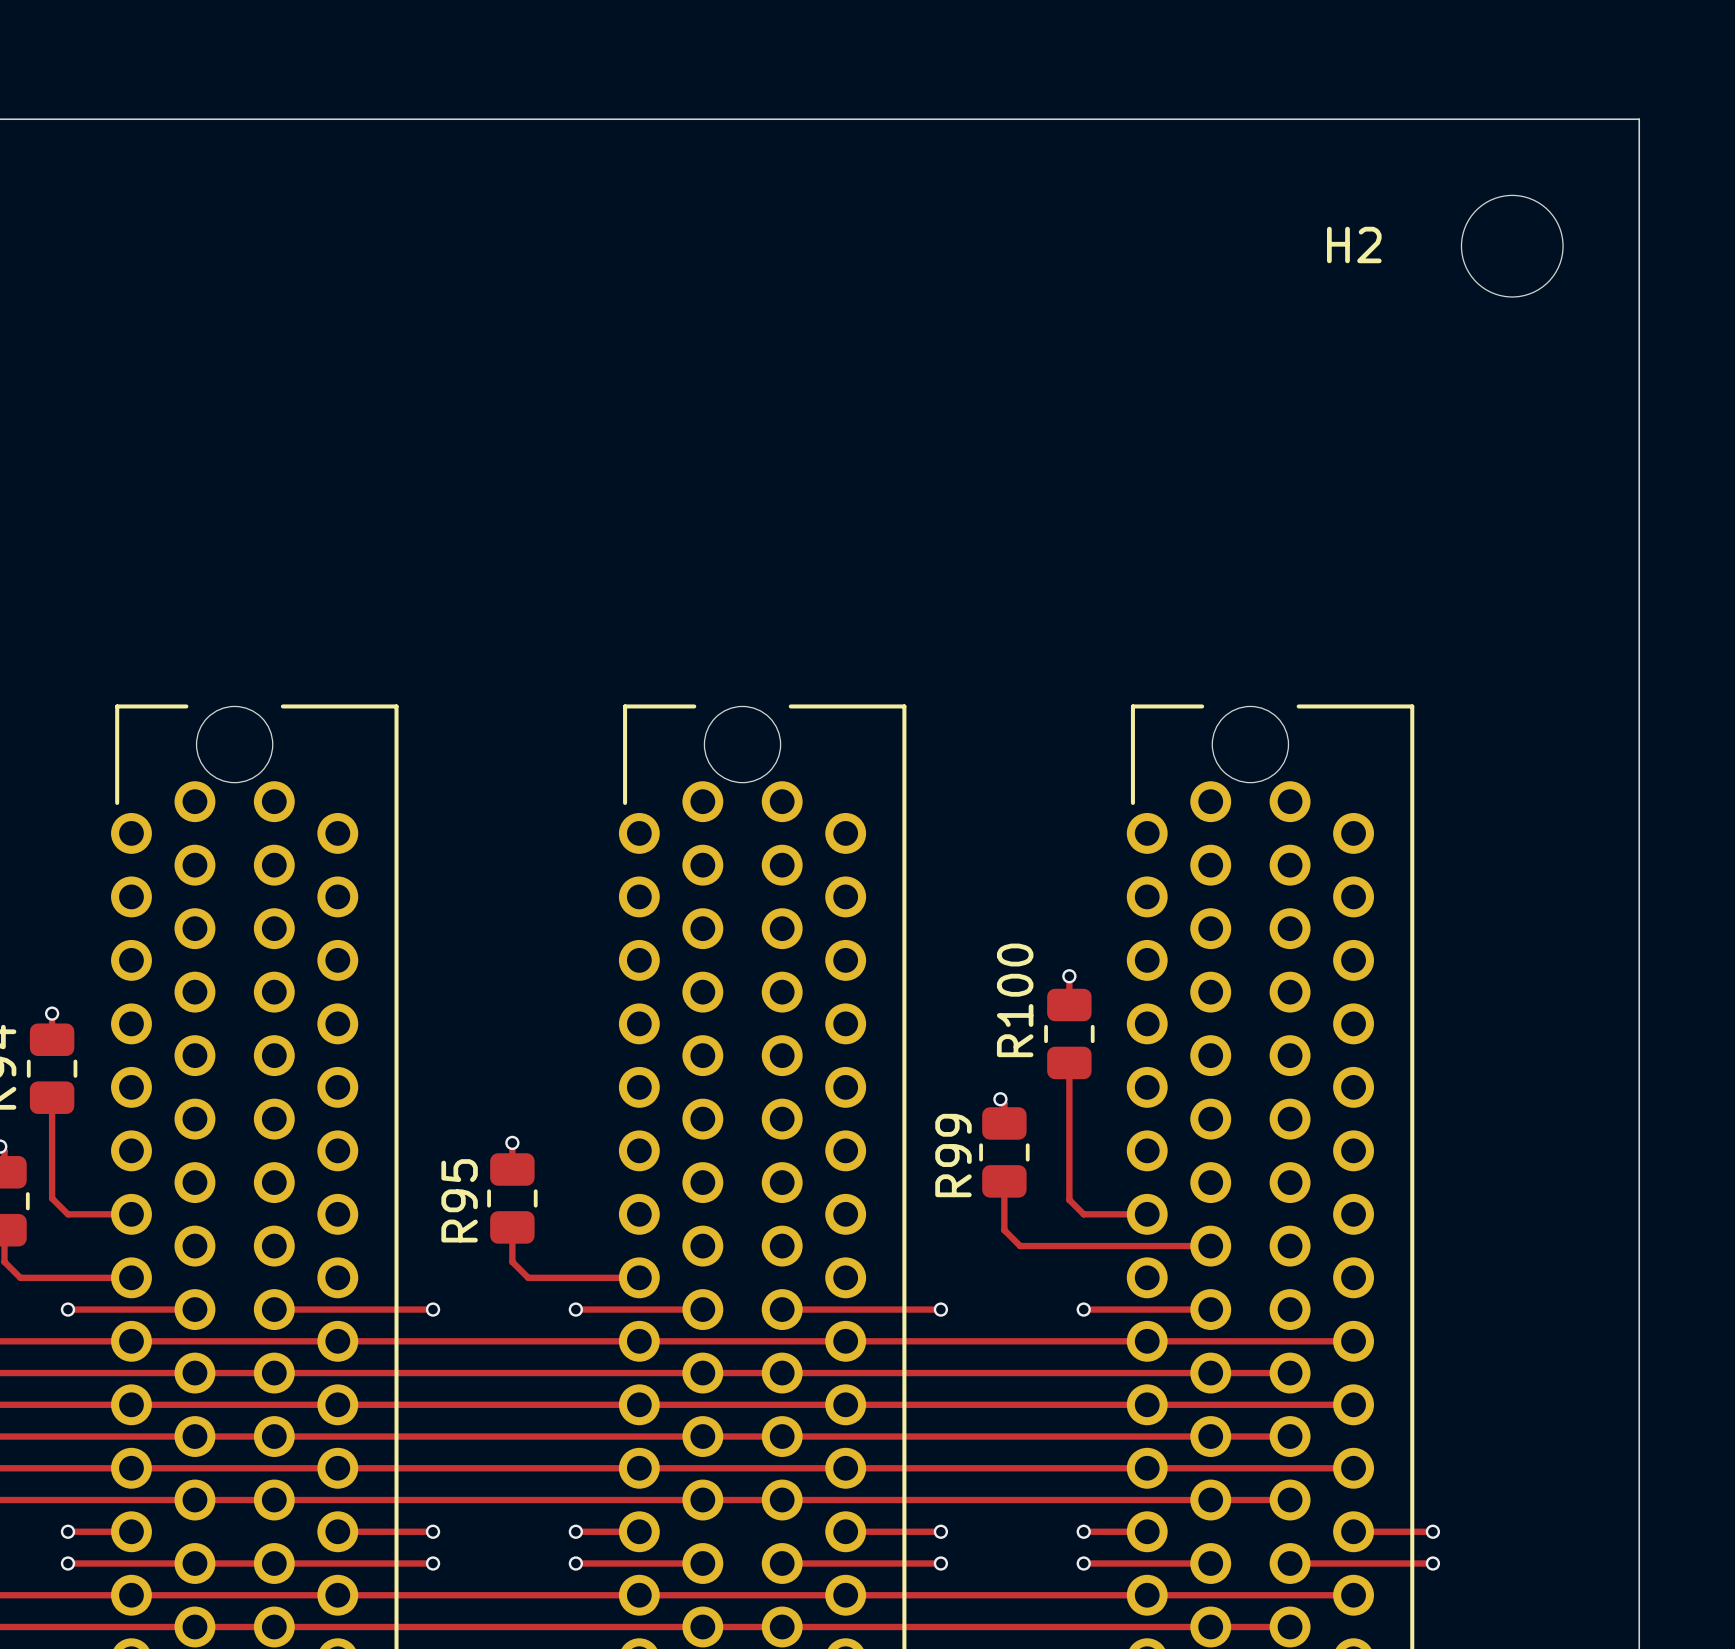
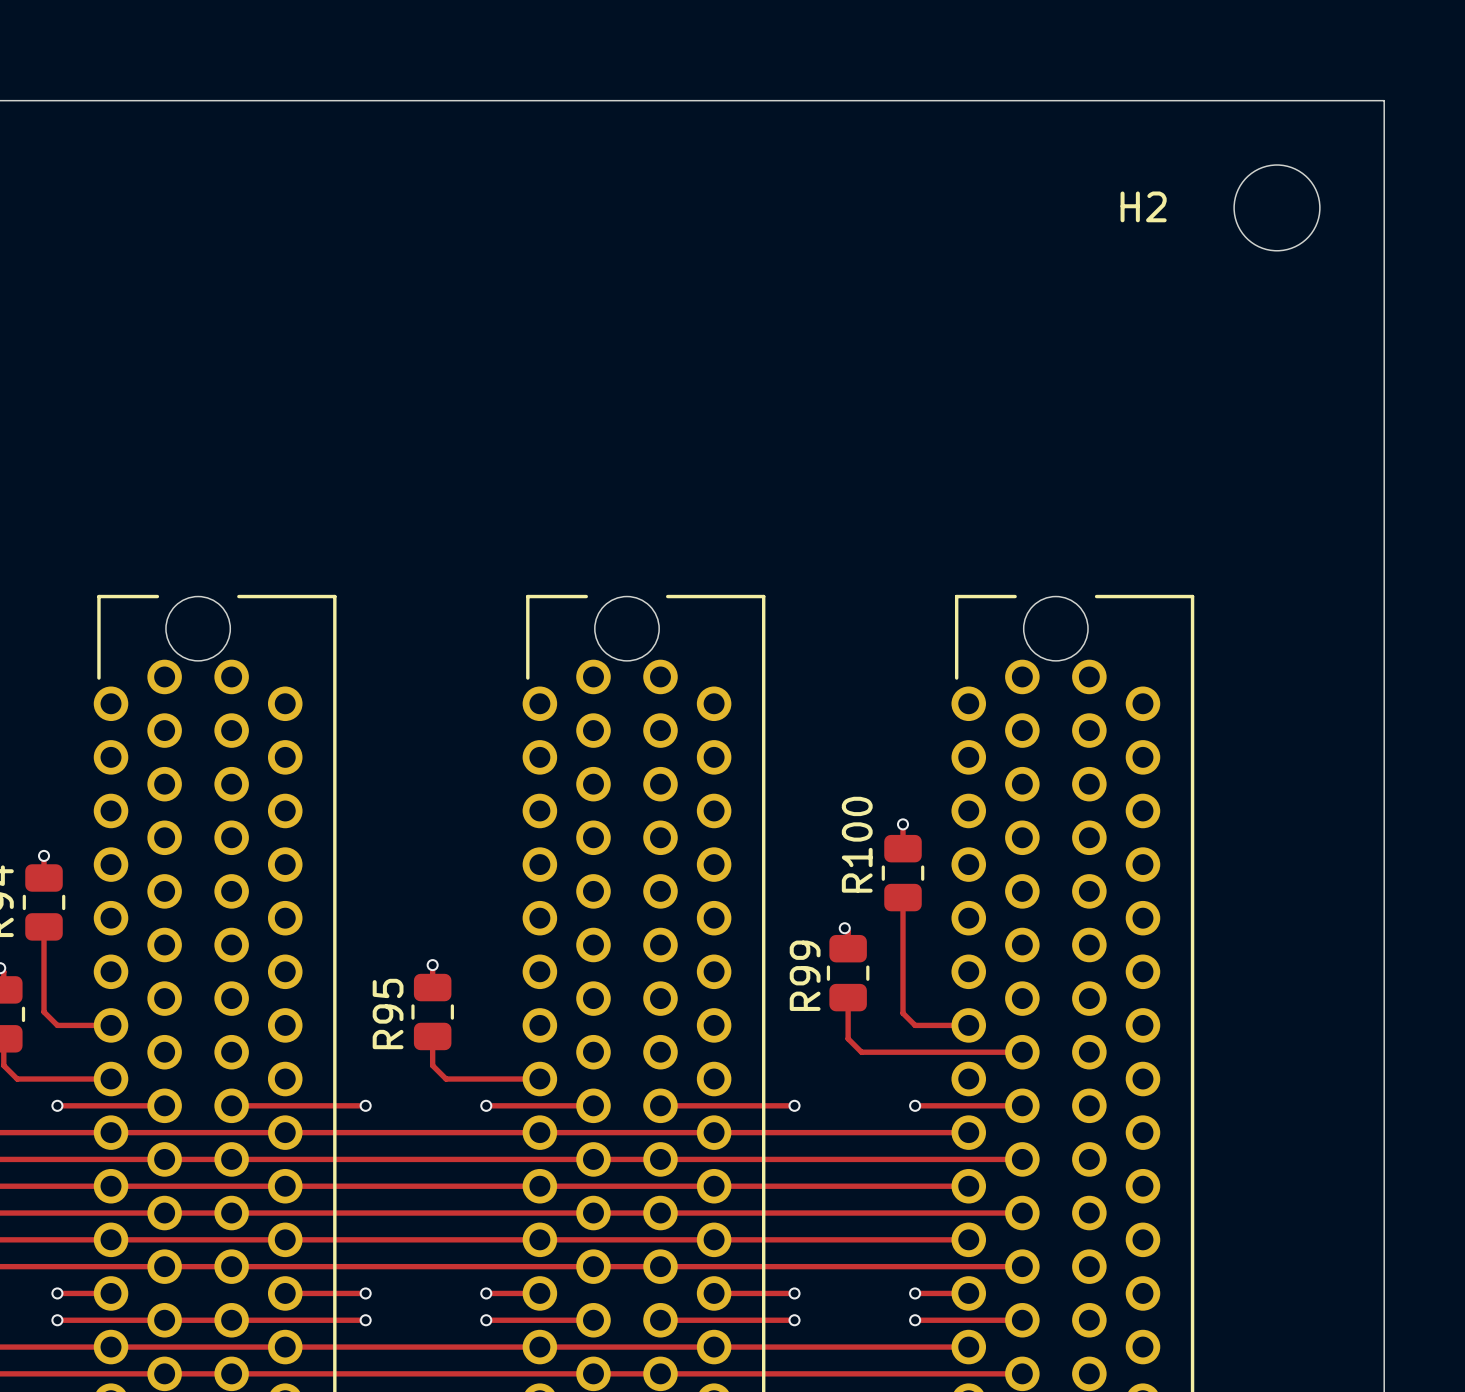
track: (1147, 1341) (1353, 1341) -> none
track: (1210, 1373) (1290, 1373) -> none
track: (1147, 1404) (1353, 1404) -> none
track: (1210, 1436) (1290, 1436) -> none
track: (1147, 1468) (1353, 1468) -> none
track: (1210, 1500) (1290, 1500) -> none
track: (1353, 1531) (1432, 1531) -> none
via: (1432, 1531) -> none
track: (1290, 1563) (1432, 1563) -> none
via: (1432, 1563) -> none
track: (1147, 1595) (1353, 1595) -> none
track: (1210, 1626) (1290, 1626) -> none

